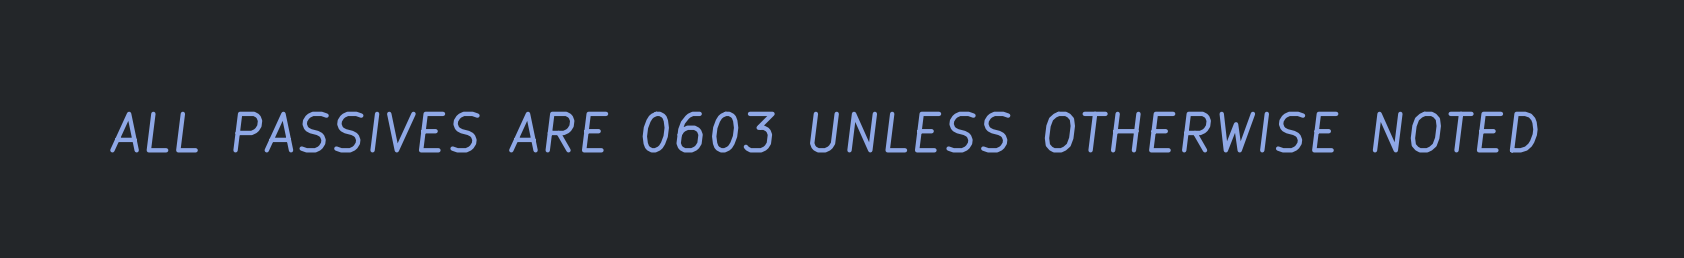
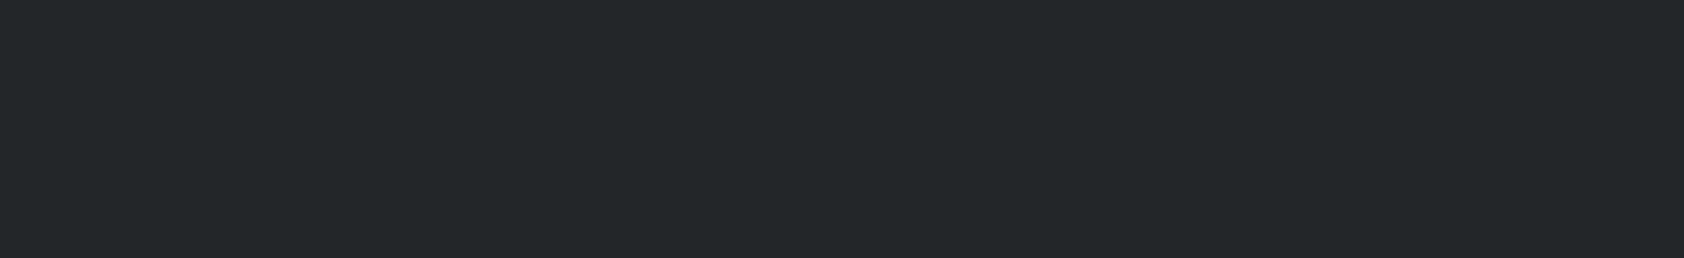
text: ALL PASSIVES ARE 0603 UNLESS OTHERWISE NOTED (823, 132) -> none

